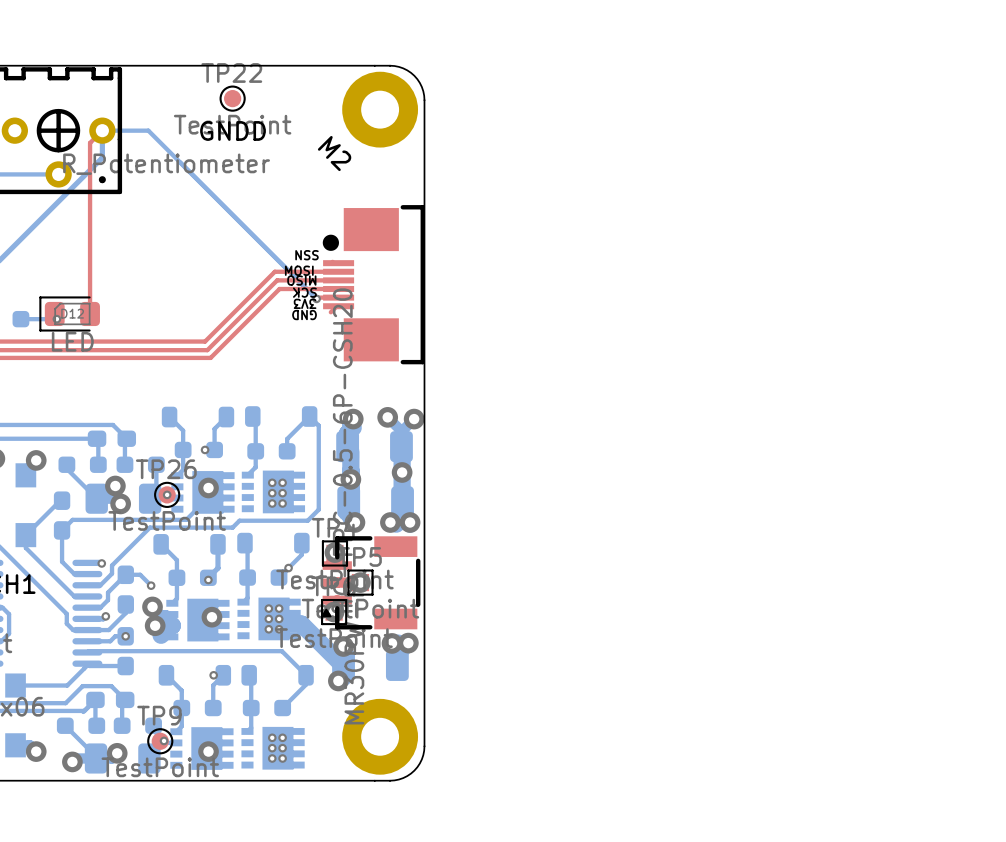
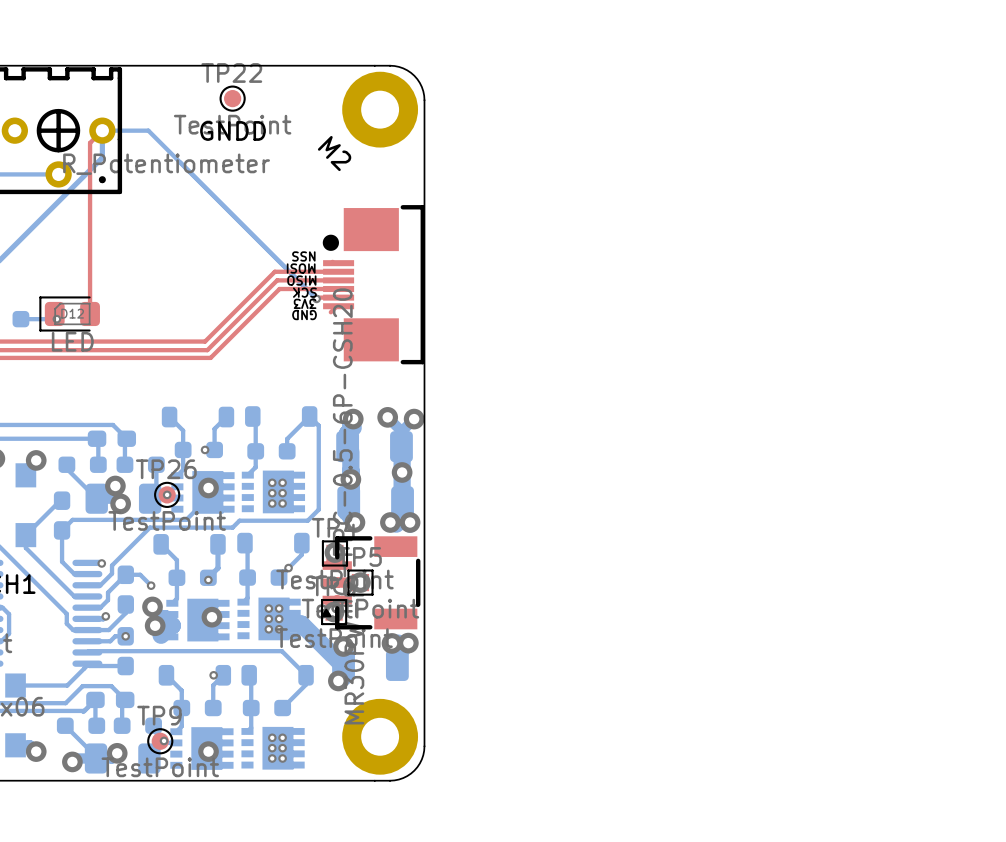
text rotation: 0° (306, 255) -> 180° (303, 256)
text rotation: 0° (299, 270) -> 180° (301, 268)

